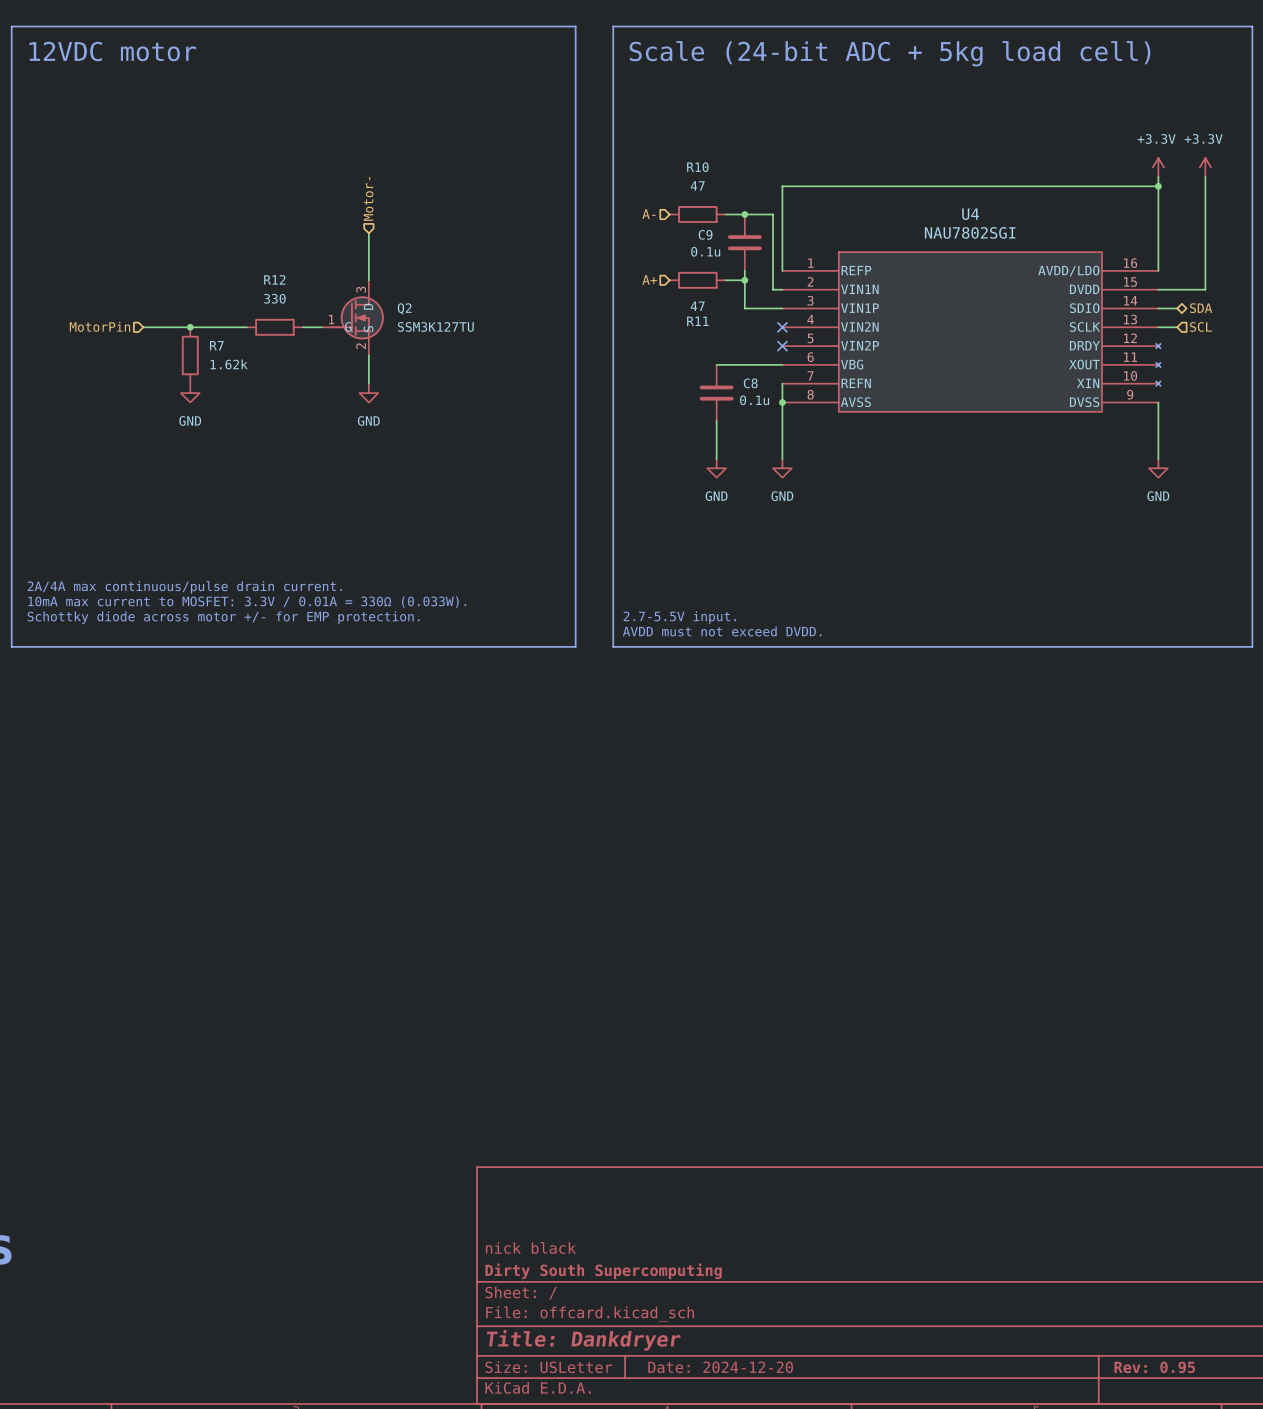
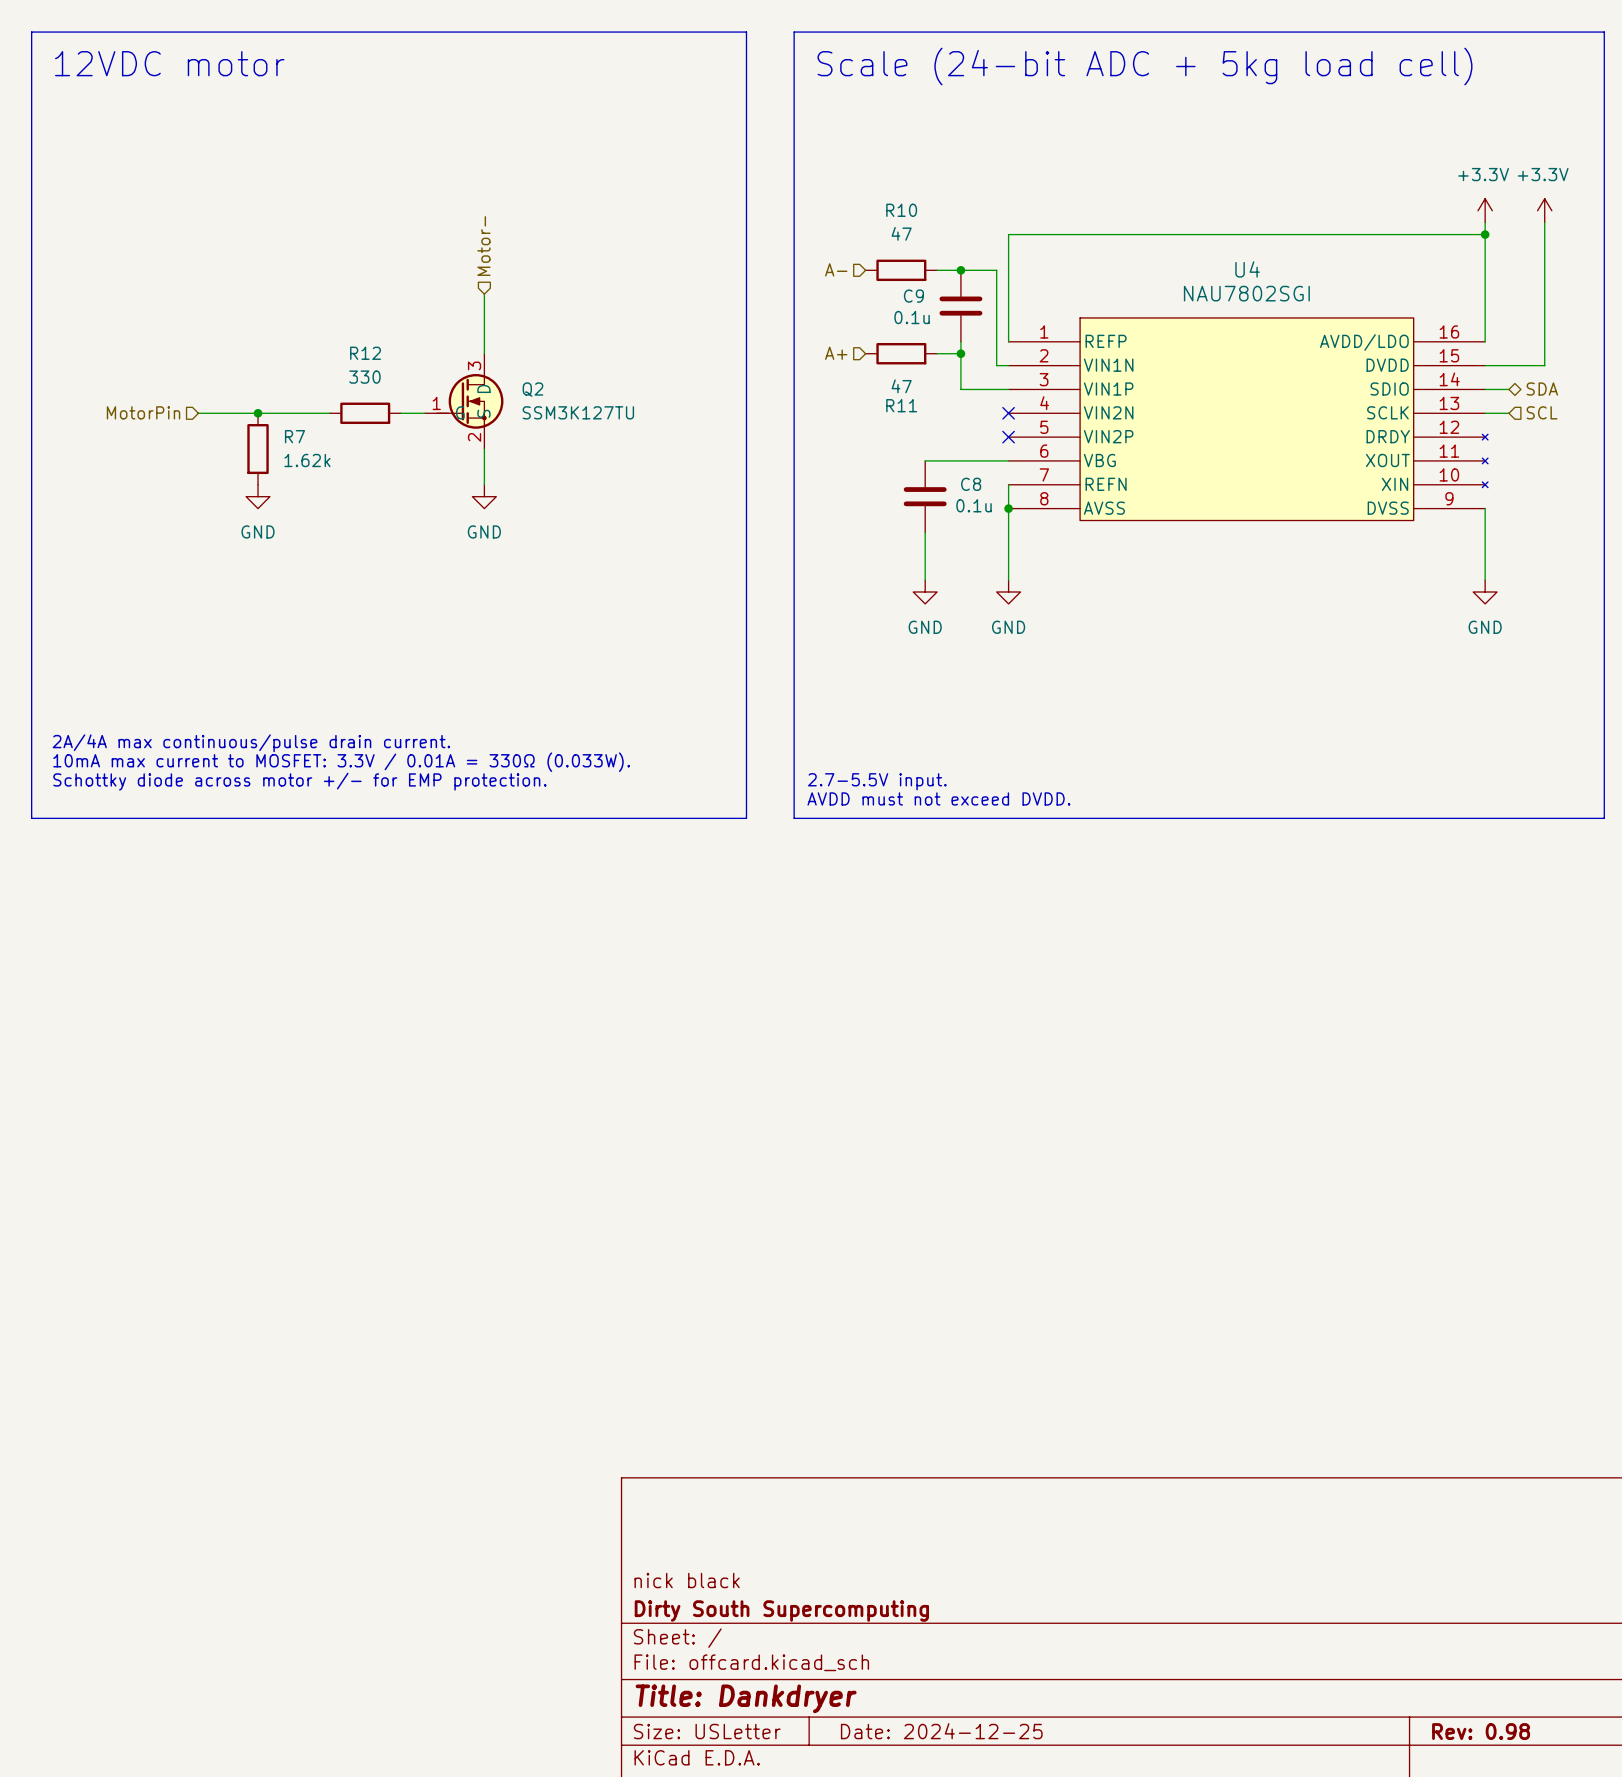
title block: Date: 2024-12-20 (720, 1367) -> Date: 2024-12-25 (941, 1731)
title block: Rev: 0.95 (1154, 1367) -> Rev: 0.98 (1481, 1731)

